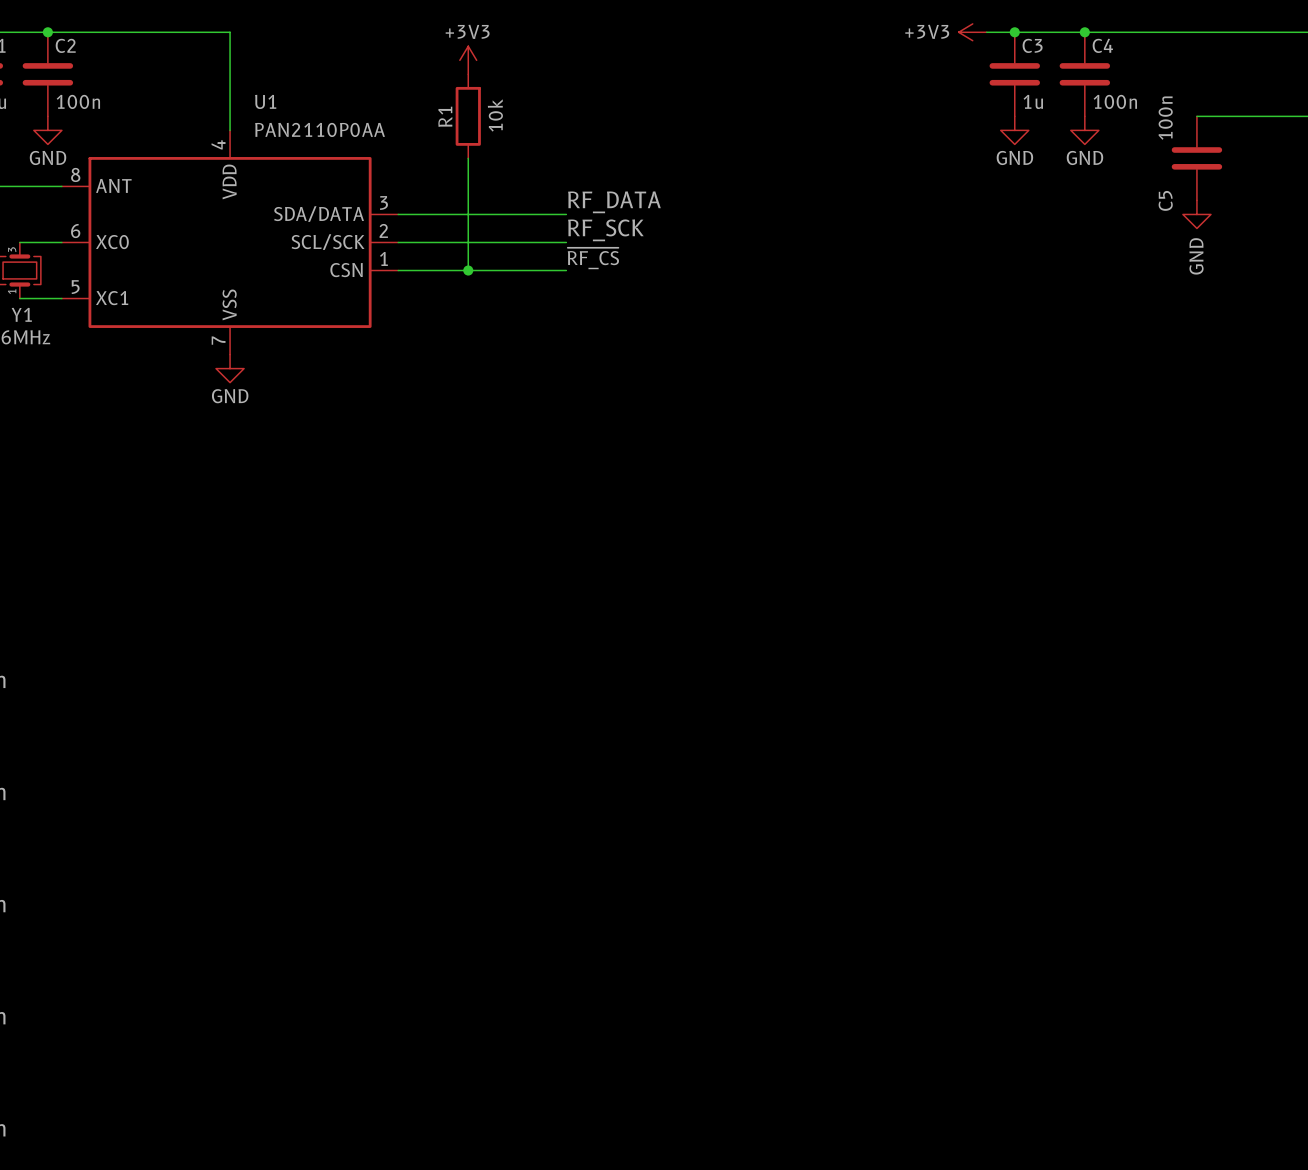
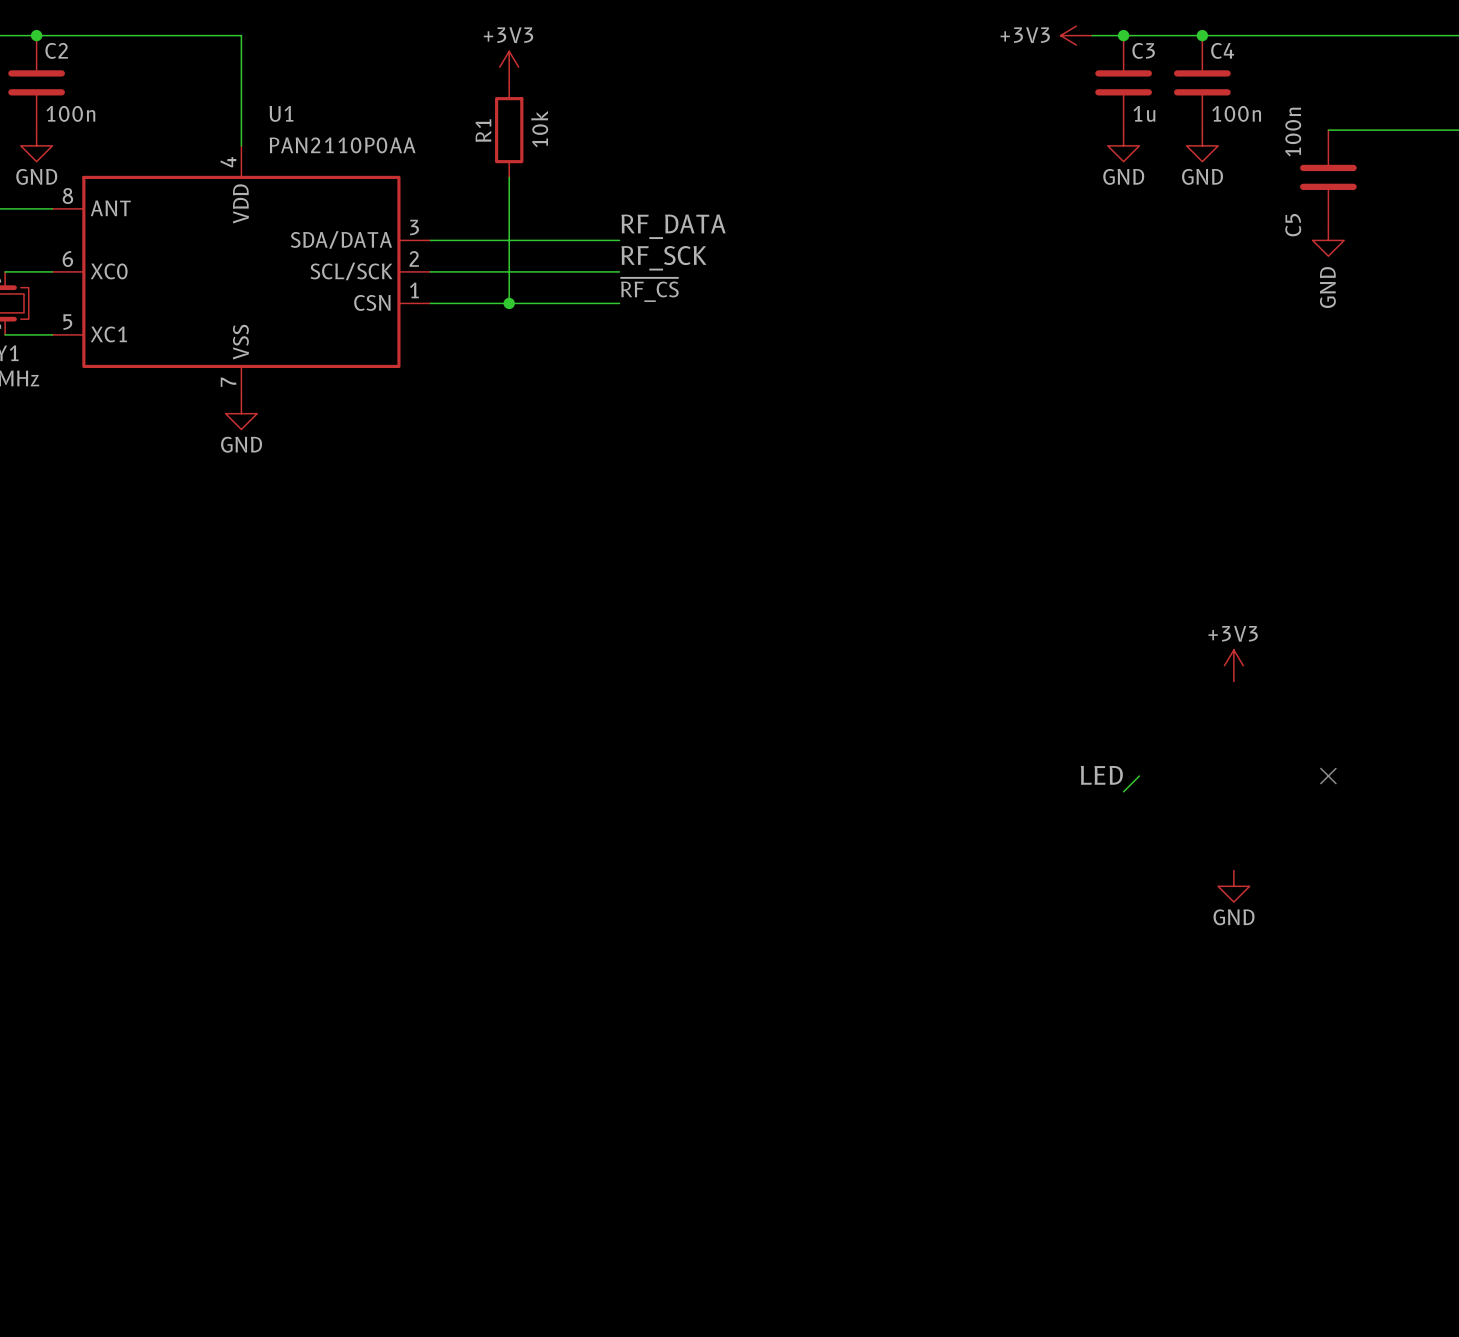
power symbol: none -> +3V3 (1233, 665)
label: none -> LED (1101, 775)
wire: none -> (1139, 776) (1123, 791)
no-connect mark: none -> (1328, 776)
power symbol: none -> GND (1233, 886)

